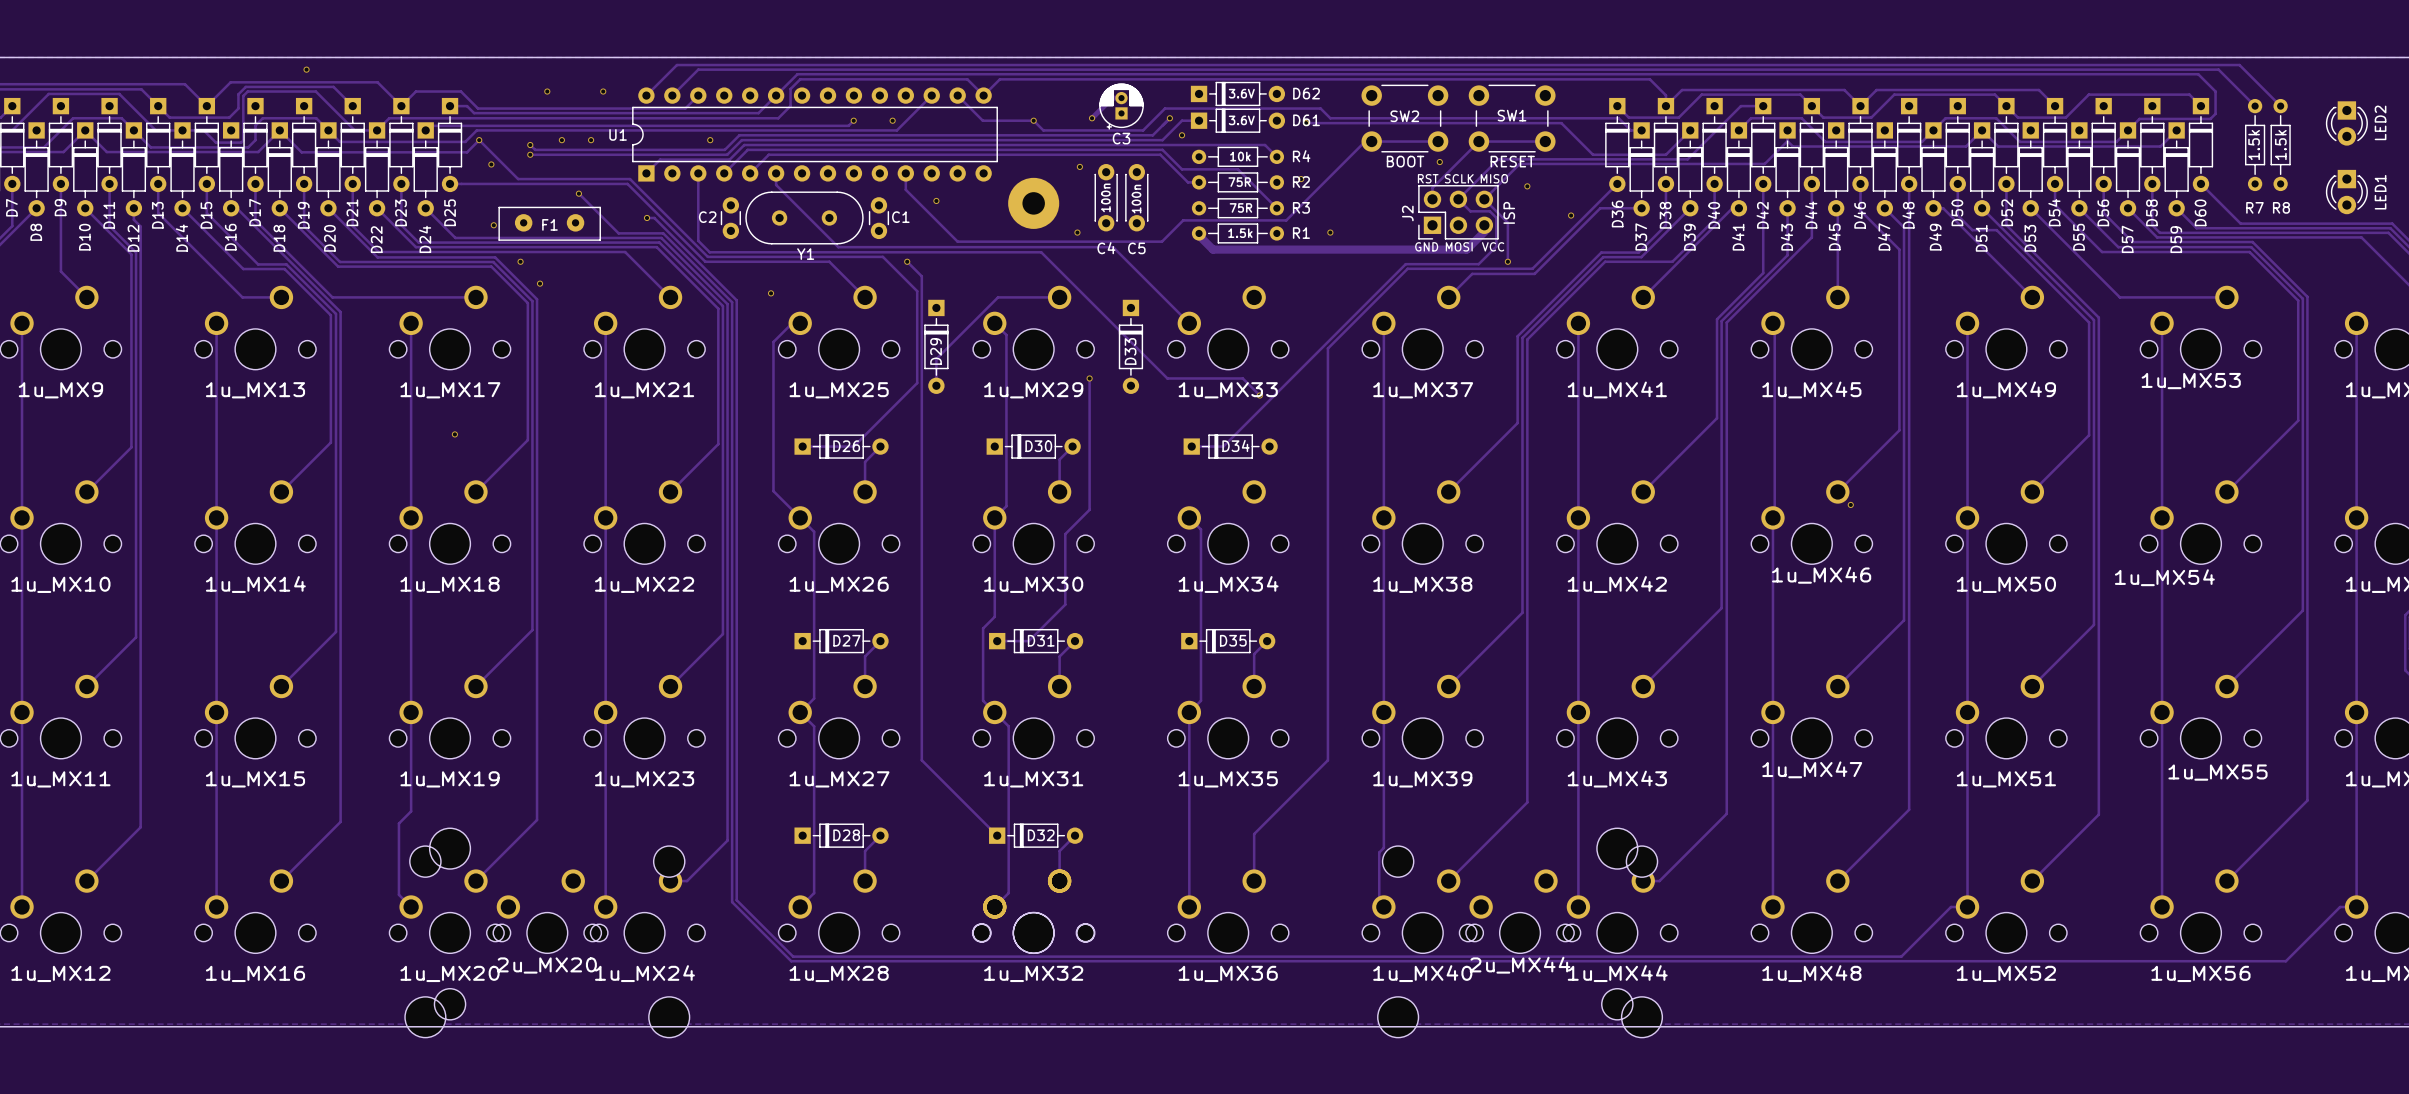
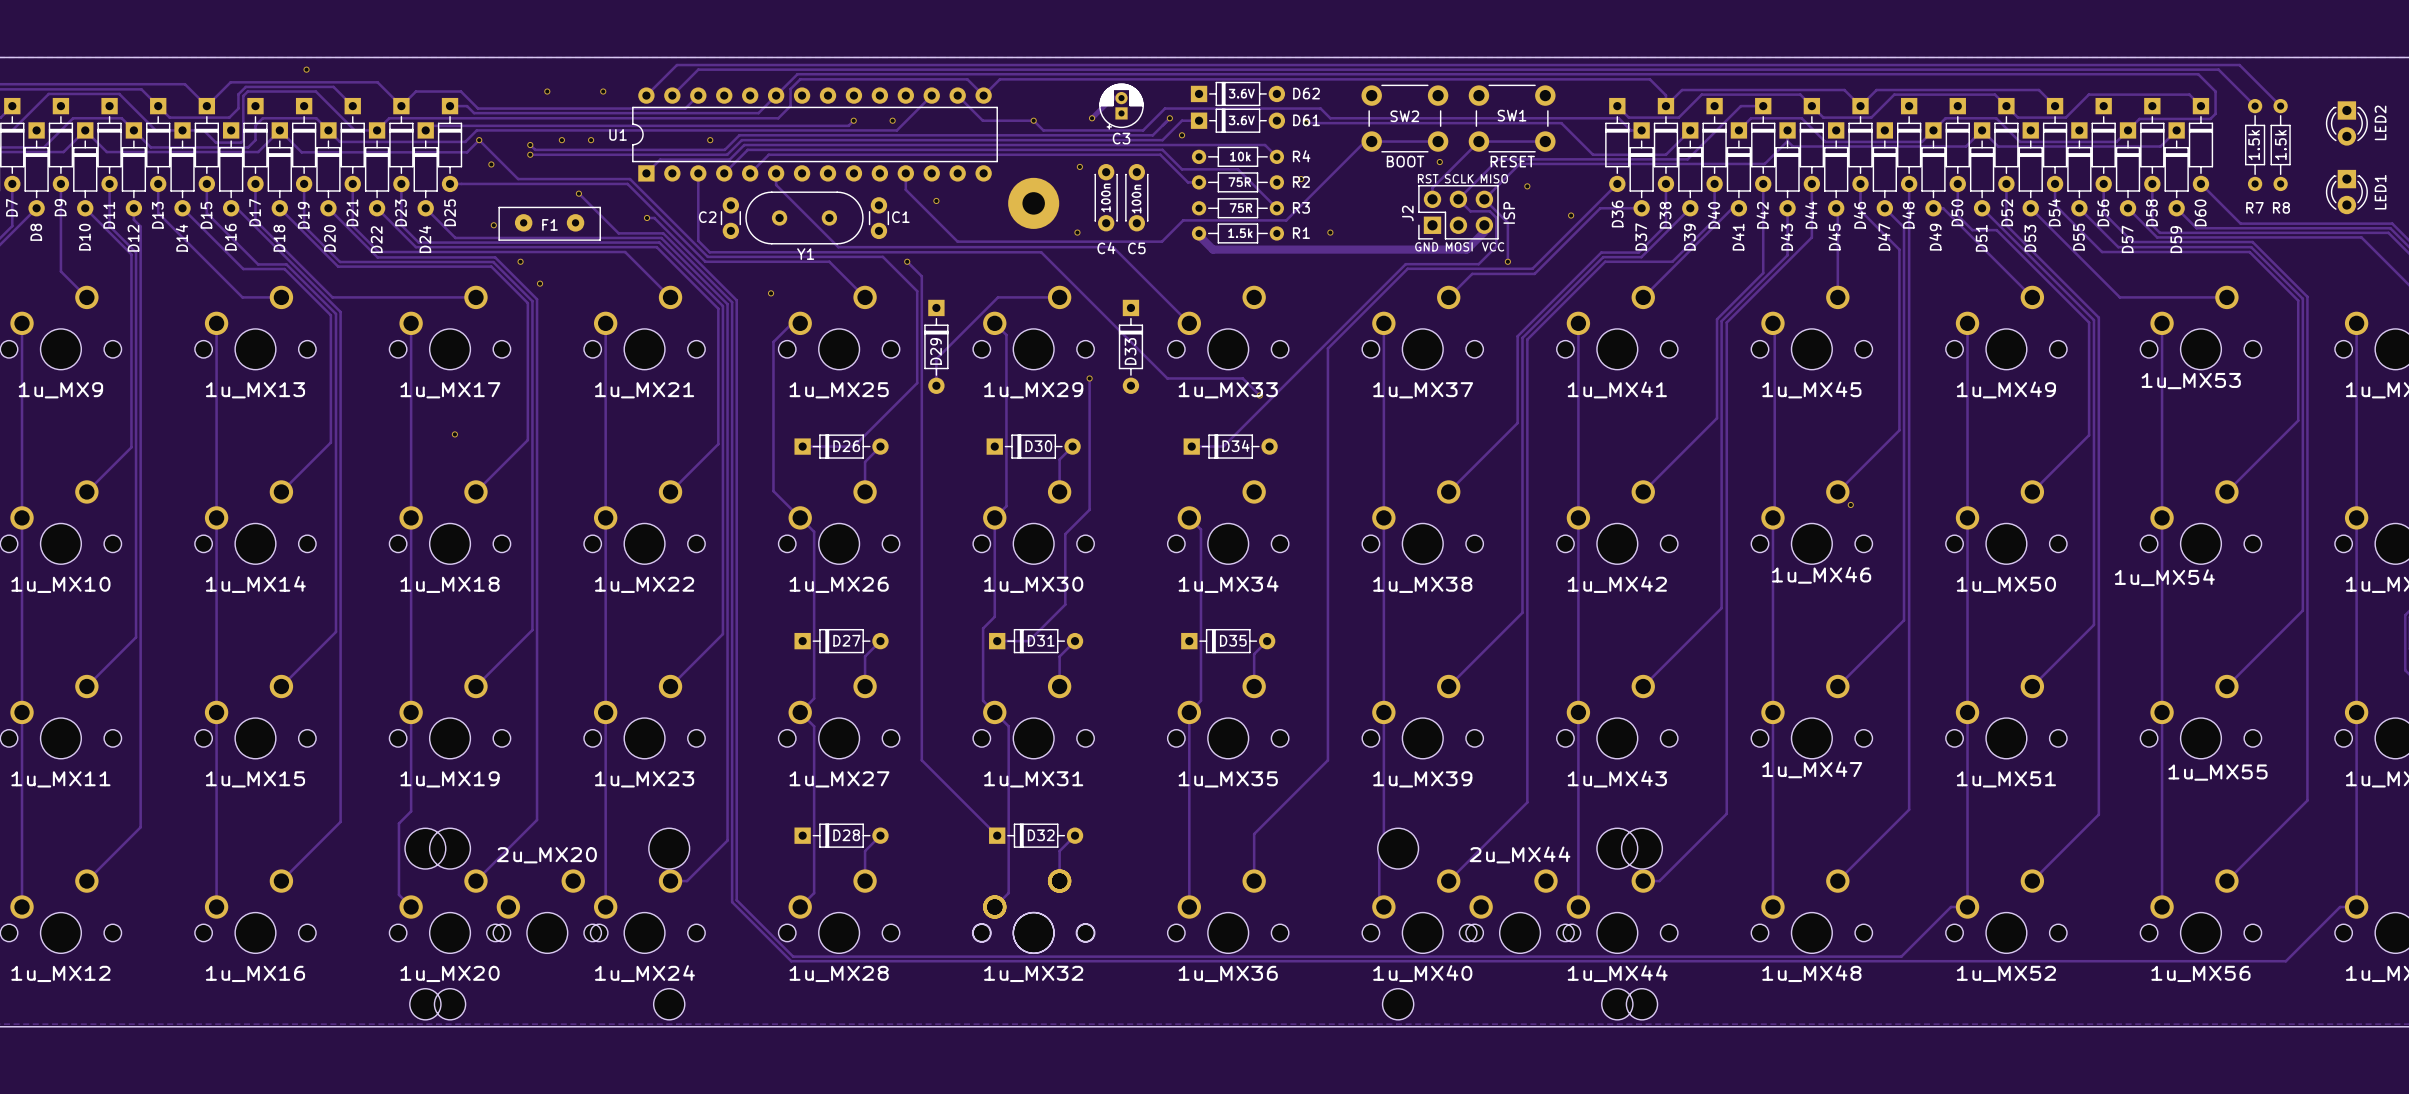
2u_MX20 footprint: [405, 846, 690, 1038] -> [405, 828, 690, 1020]
2u_MX44 footprint: [1377, 846, 1663, 1038] -> [1377, 828, 1663, 1020]
2u_MX20 name position: 2u_MX20 (546, 965) -> 2u_MX20 (546, 855)
2u_MX44 name position: 2u_MX44 (1520, 965) -> 2u_MX44 (1520, 854)

